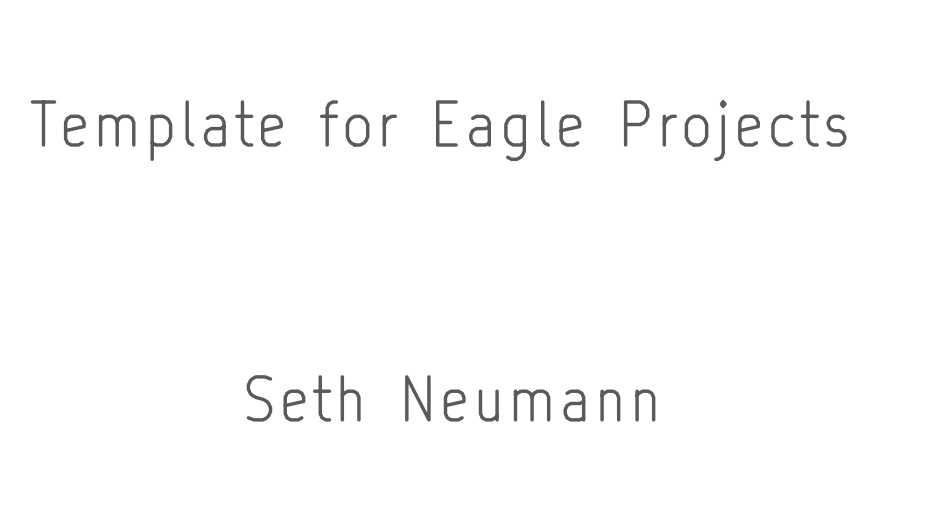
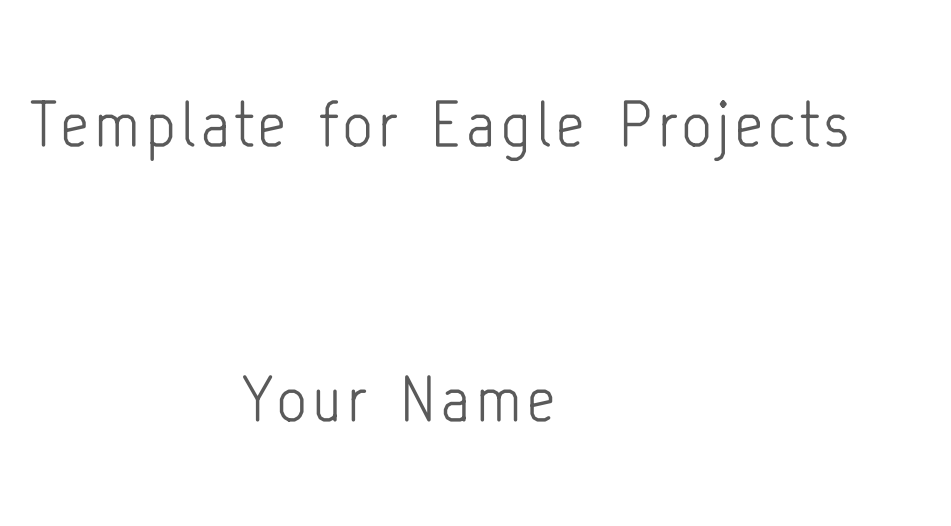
text: Seth Neumann (451, 398) -> Your Name (397, 398)

